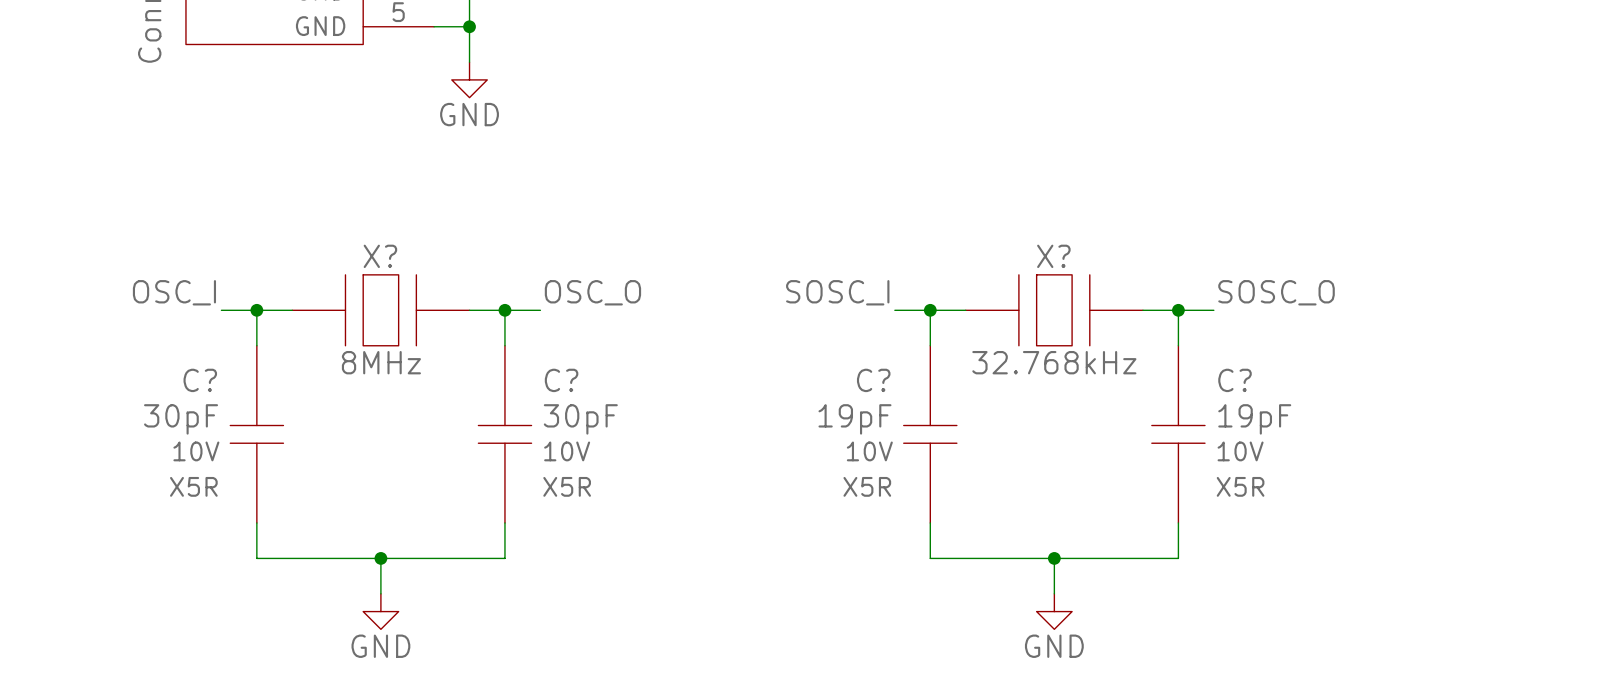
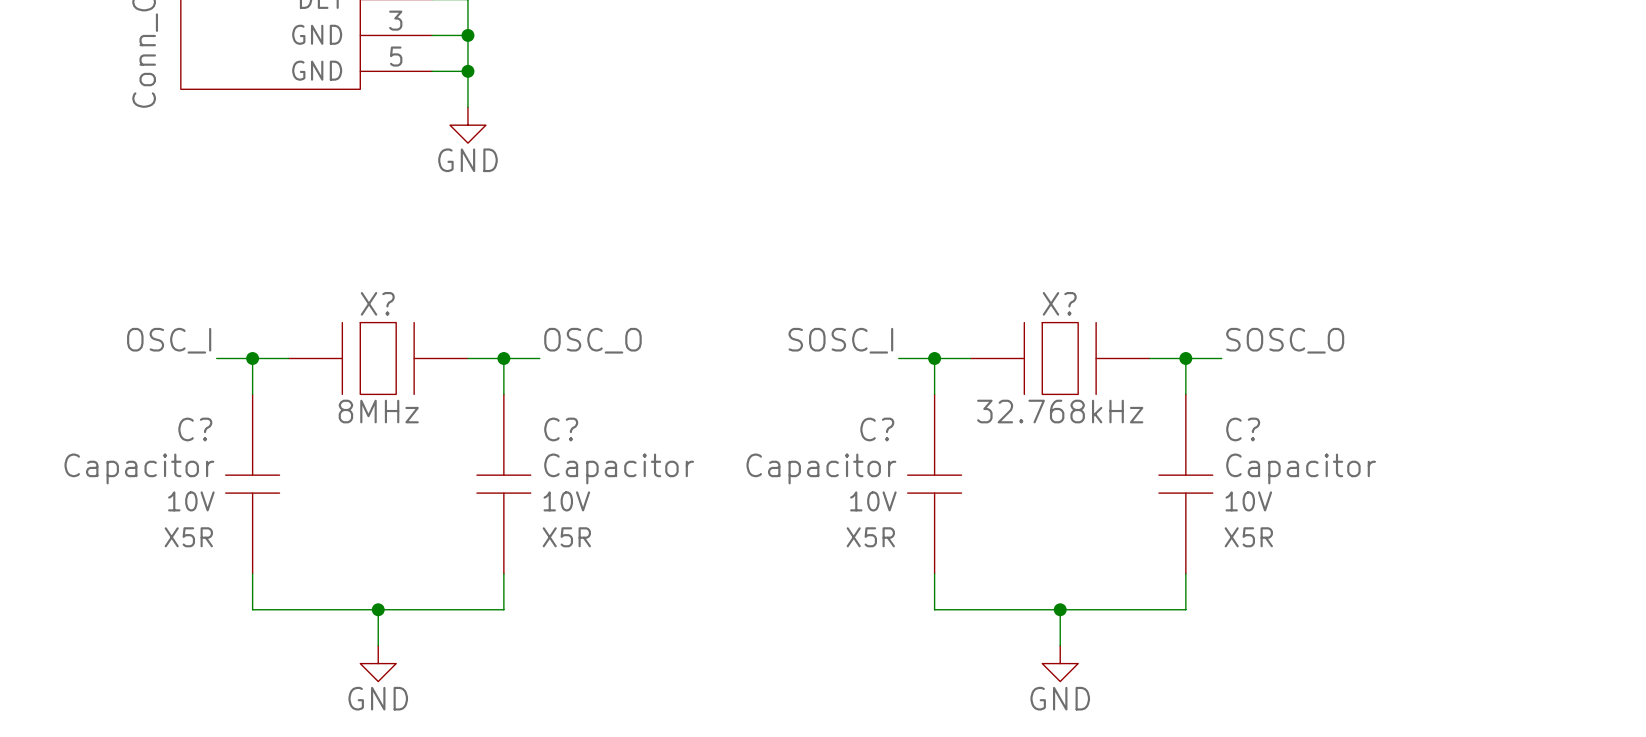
C? value: 30pF (181, 419) -> Capacitor (139, 468)
C? value: 30pF (580, 419) -> Capacitor (619, 468)
C? value: 19pF (854, 419) -> Capacitor (821, 468)
C? value: 19pF (1254, 419) -> Capacitor (1301, 468)

